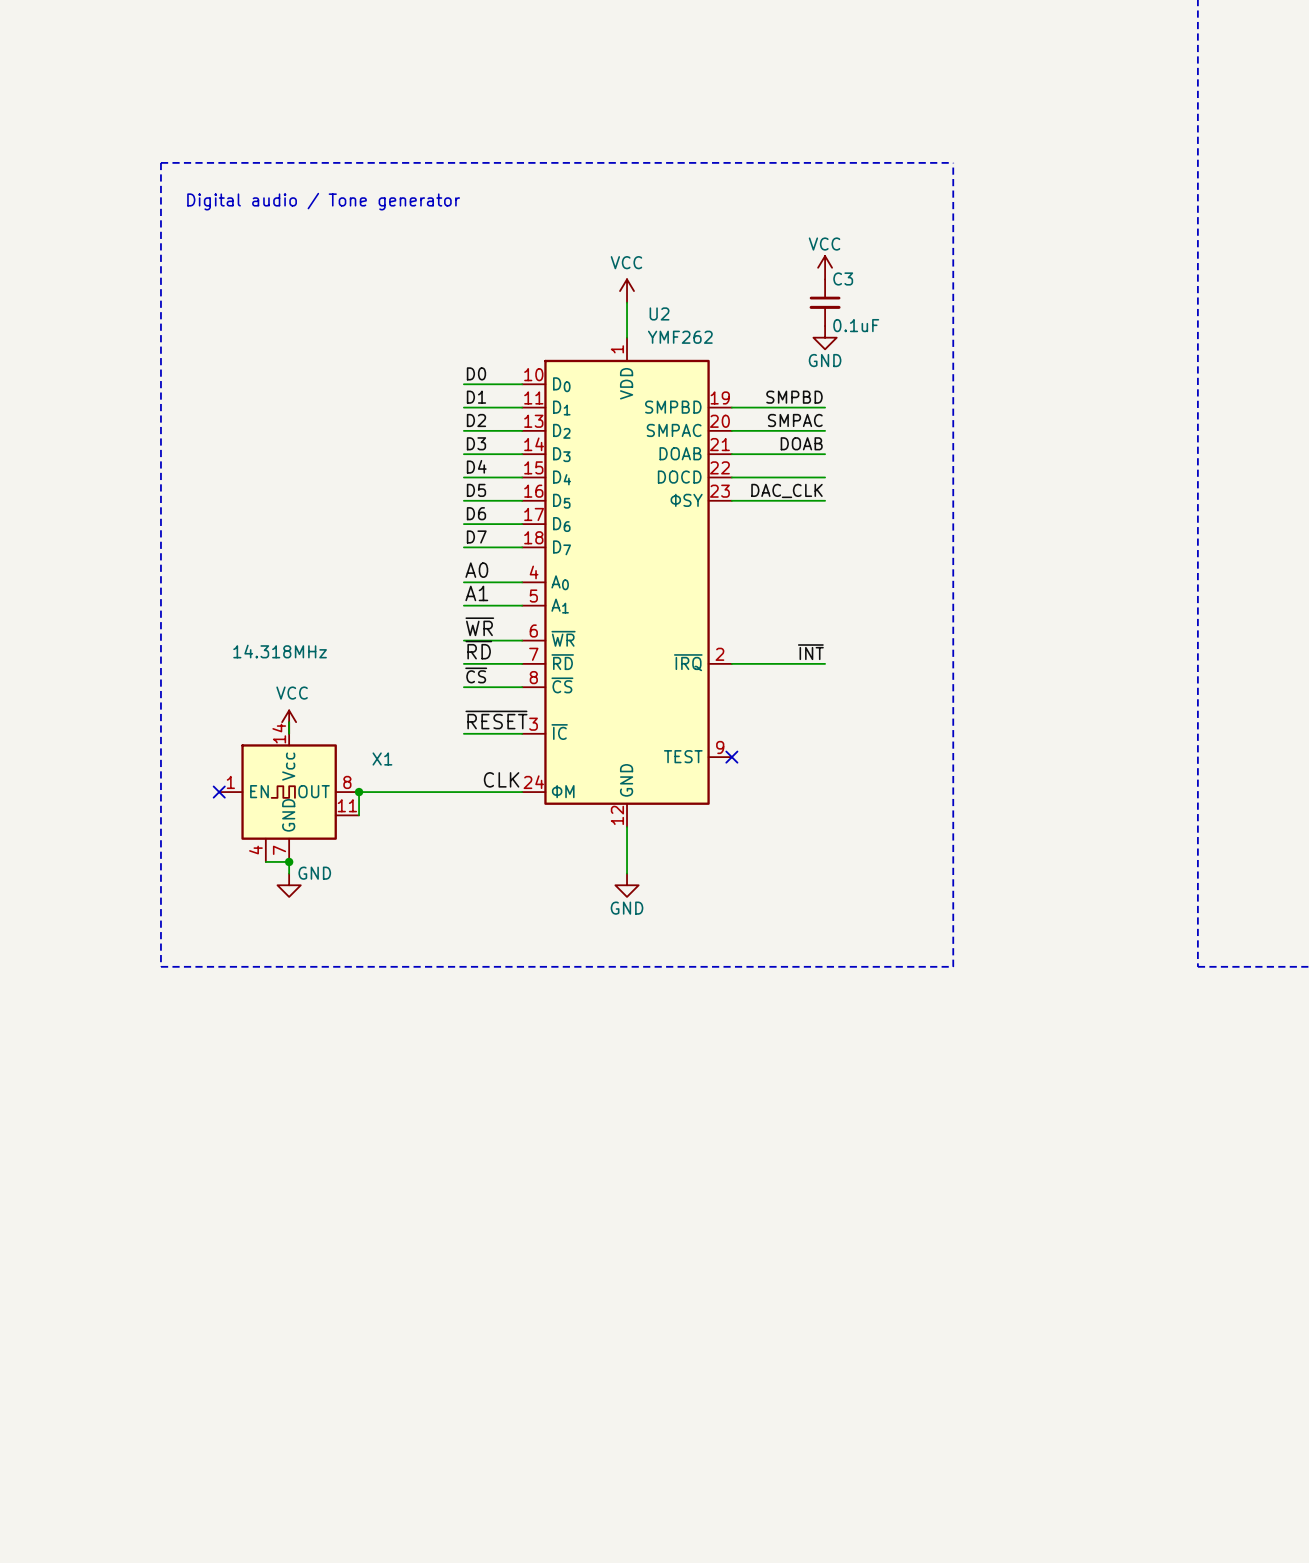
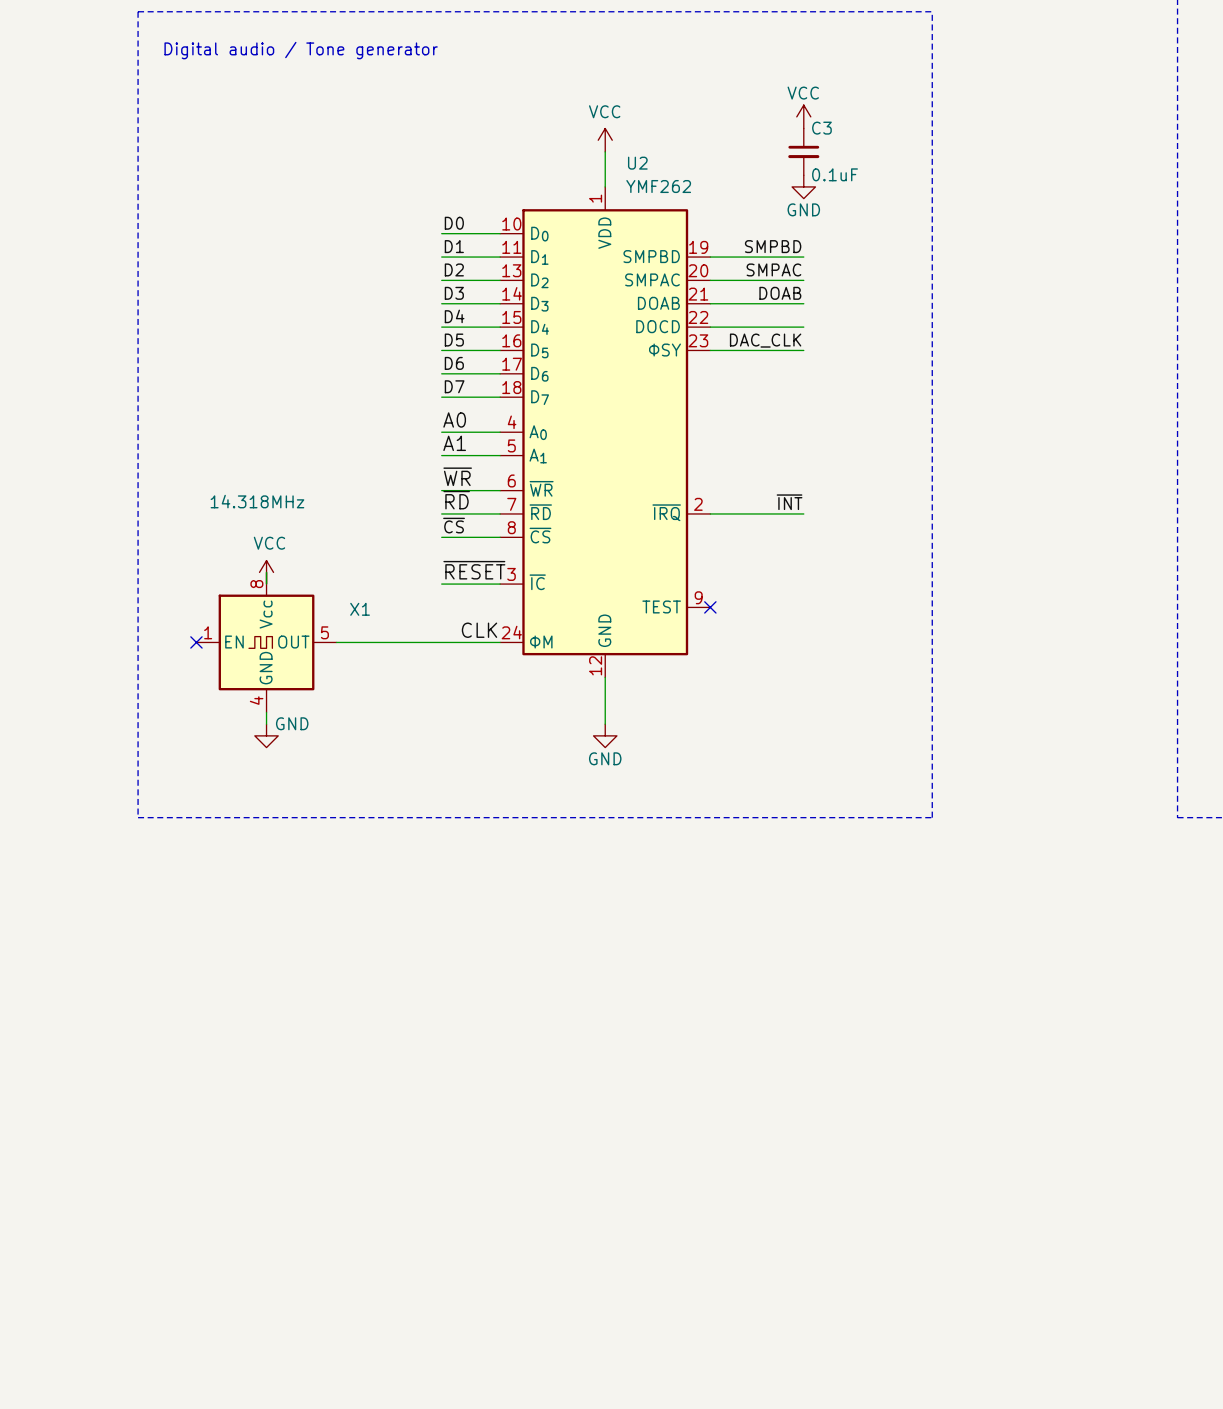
X1 symbol: [219, 722, 360, 862] -> [196, 572, 337, 713]
wire: (359, 792) (359, 815) -> none
junction: (359, 792) -> none
wire: (265, 861) (289, 861) -> none
junction: (289, 861) -> none

